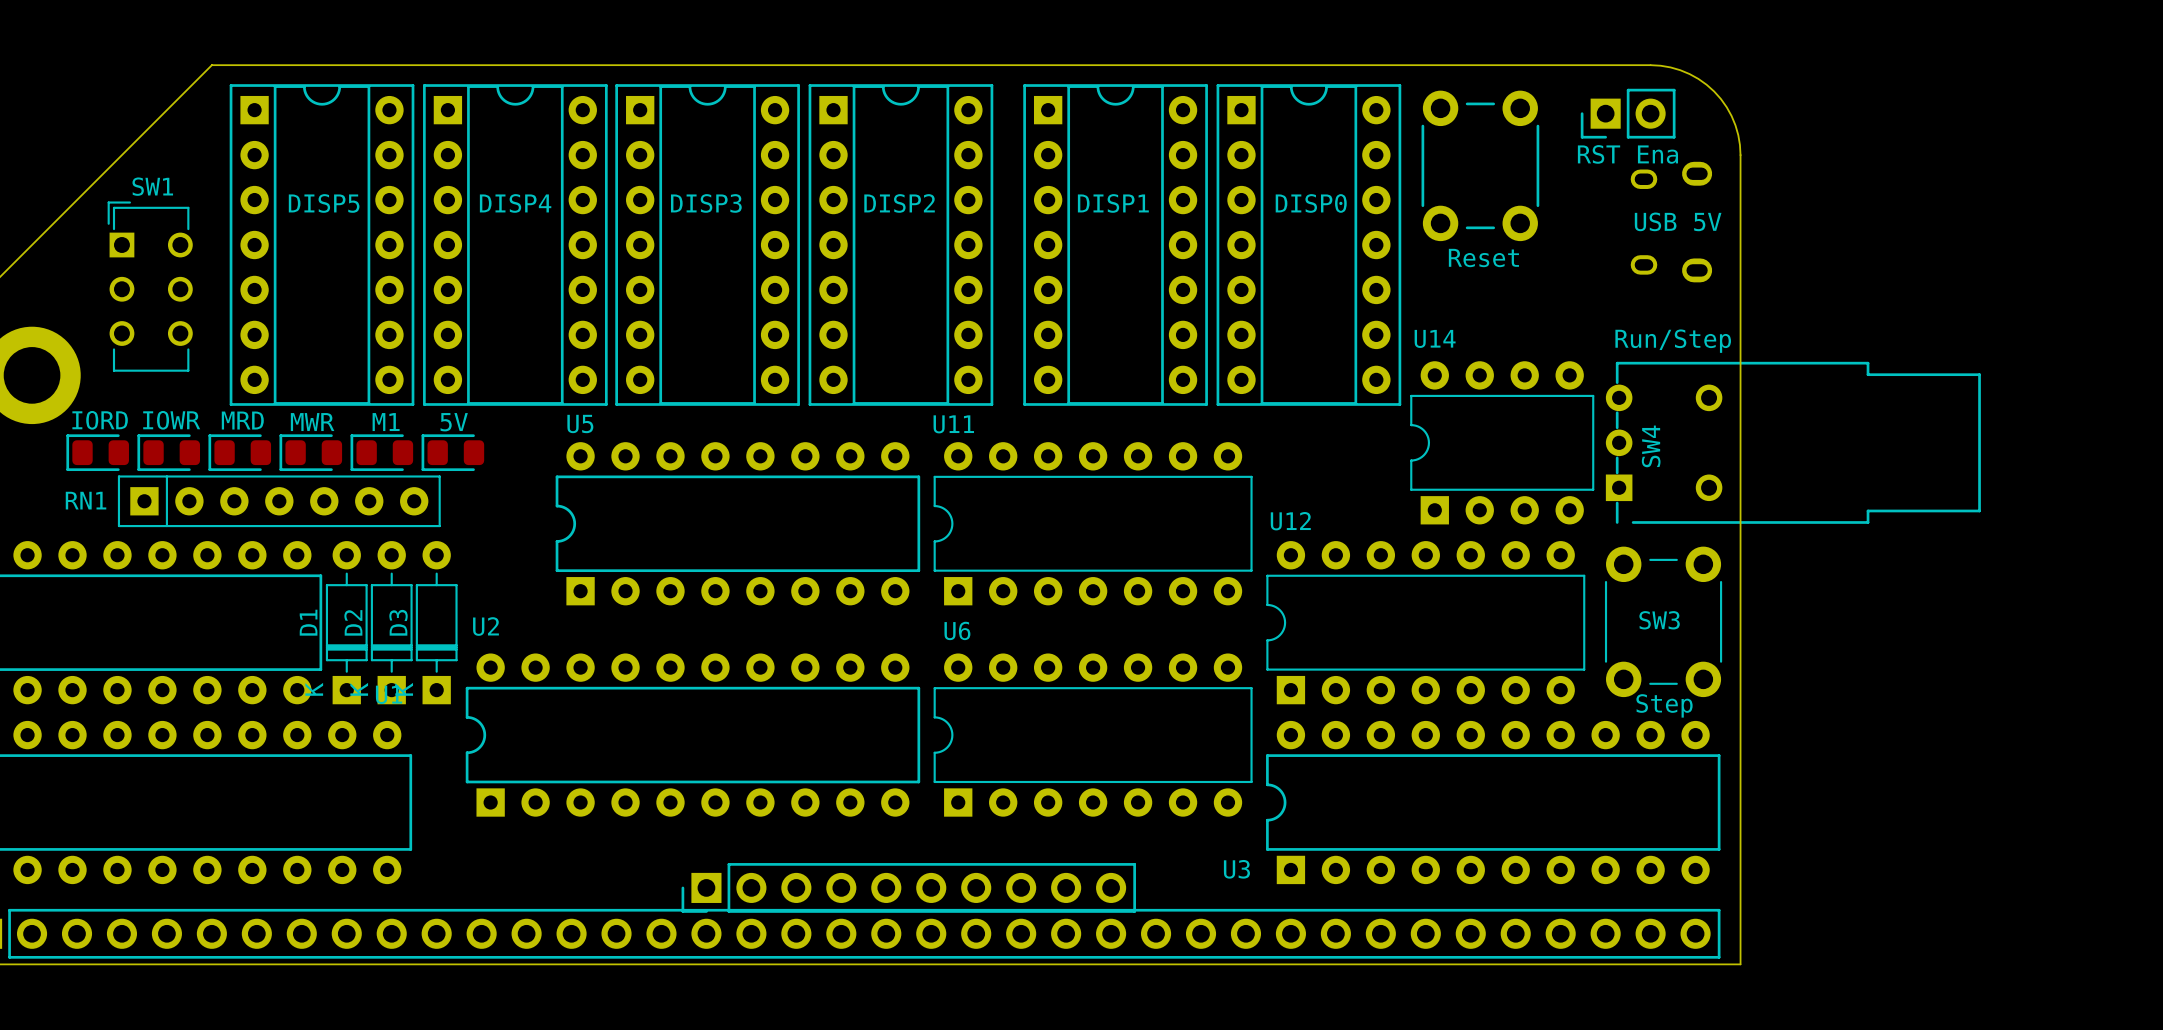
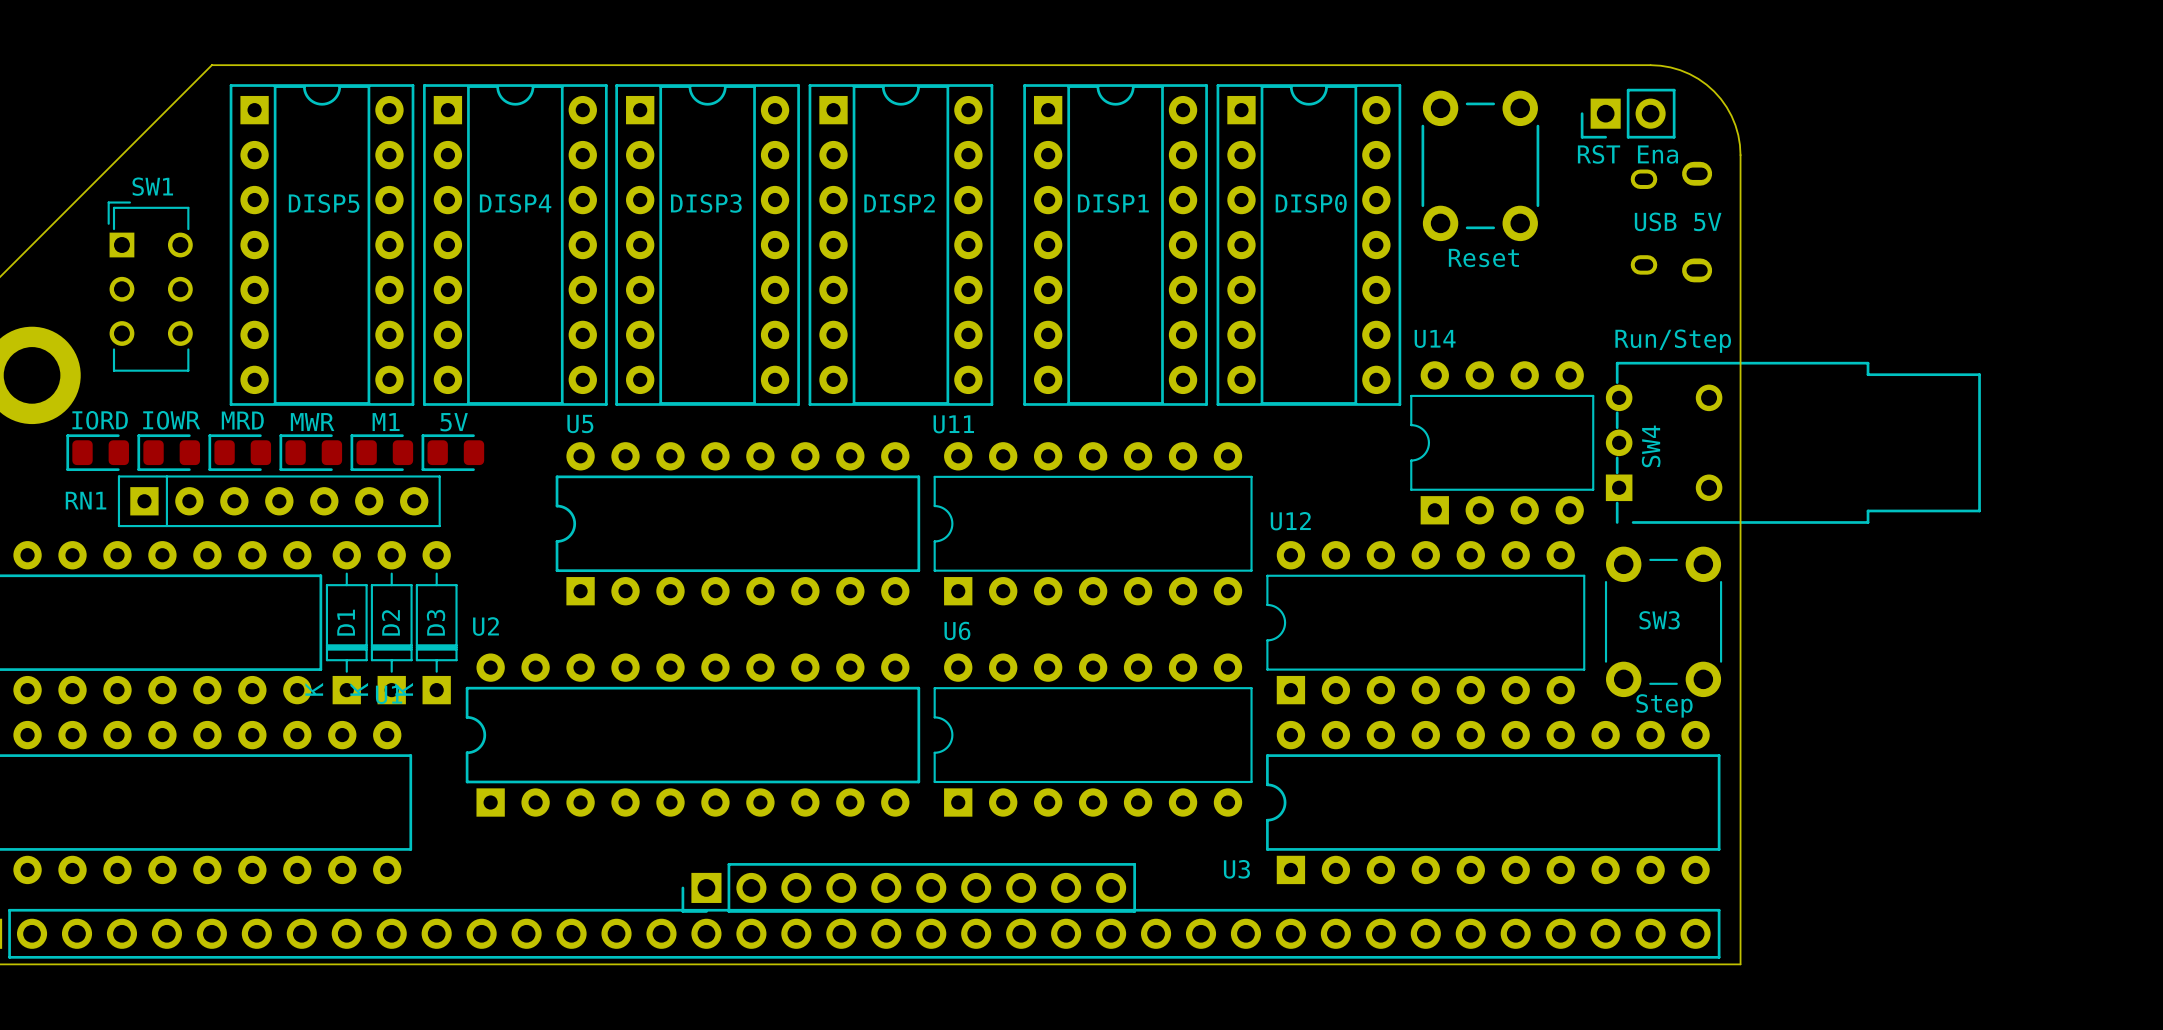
D1 name position: D1 (308, 622) -> D1 (346, 622)
D2 name position: D2 (353, 622) -> D2 (390, 622)
D3 name position: D3 (398, 622) -> D3 (436, 622)

